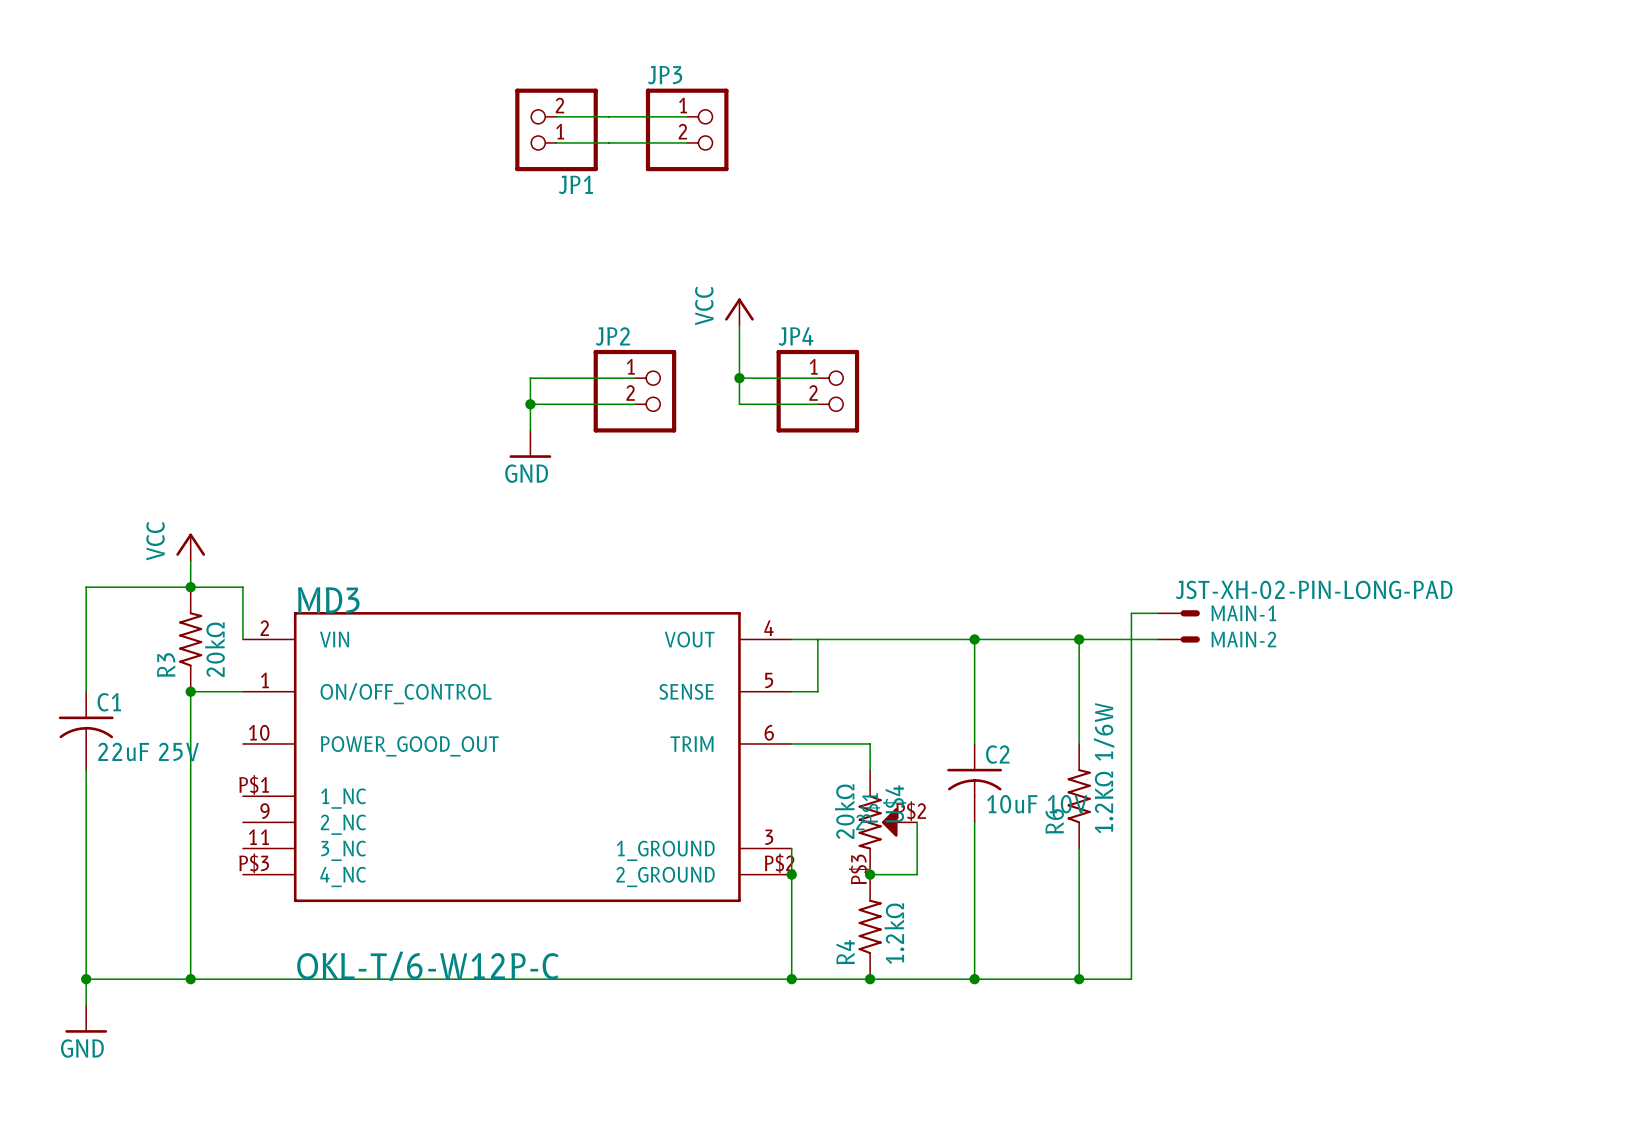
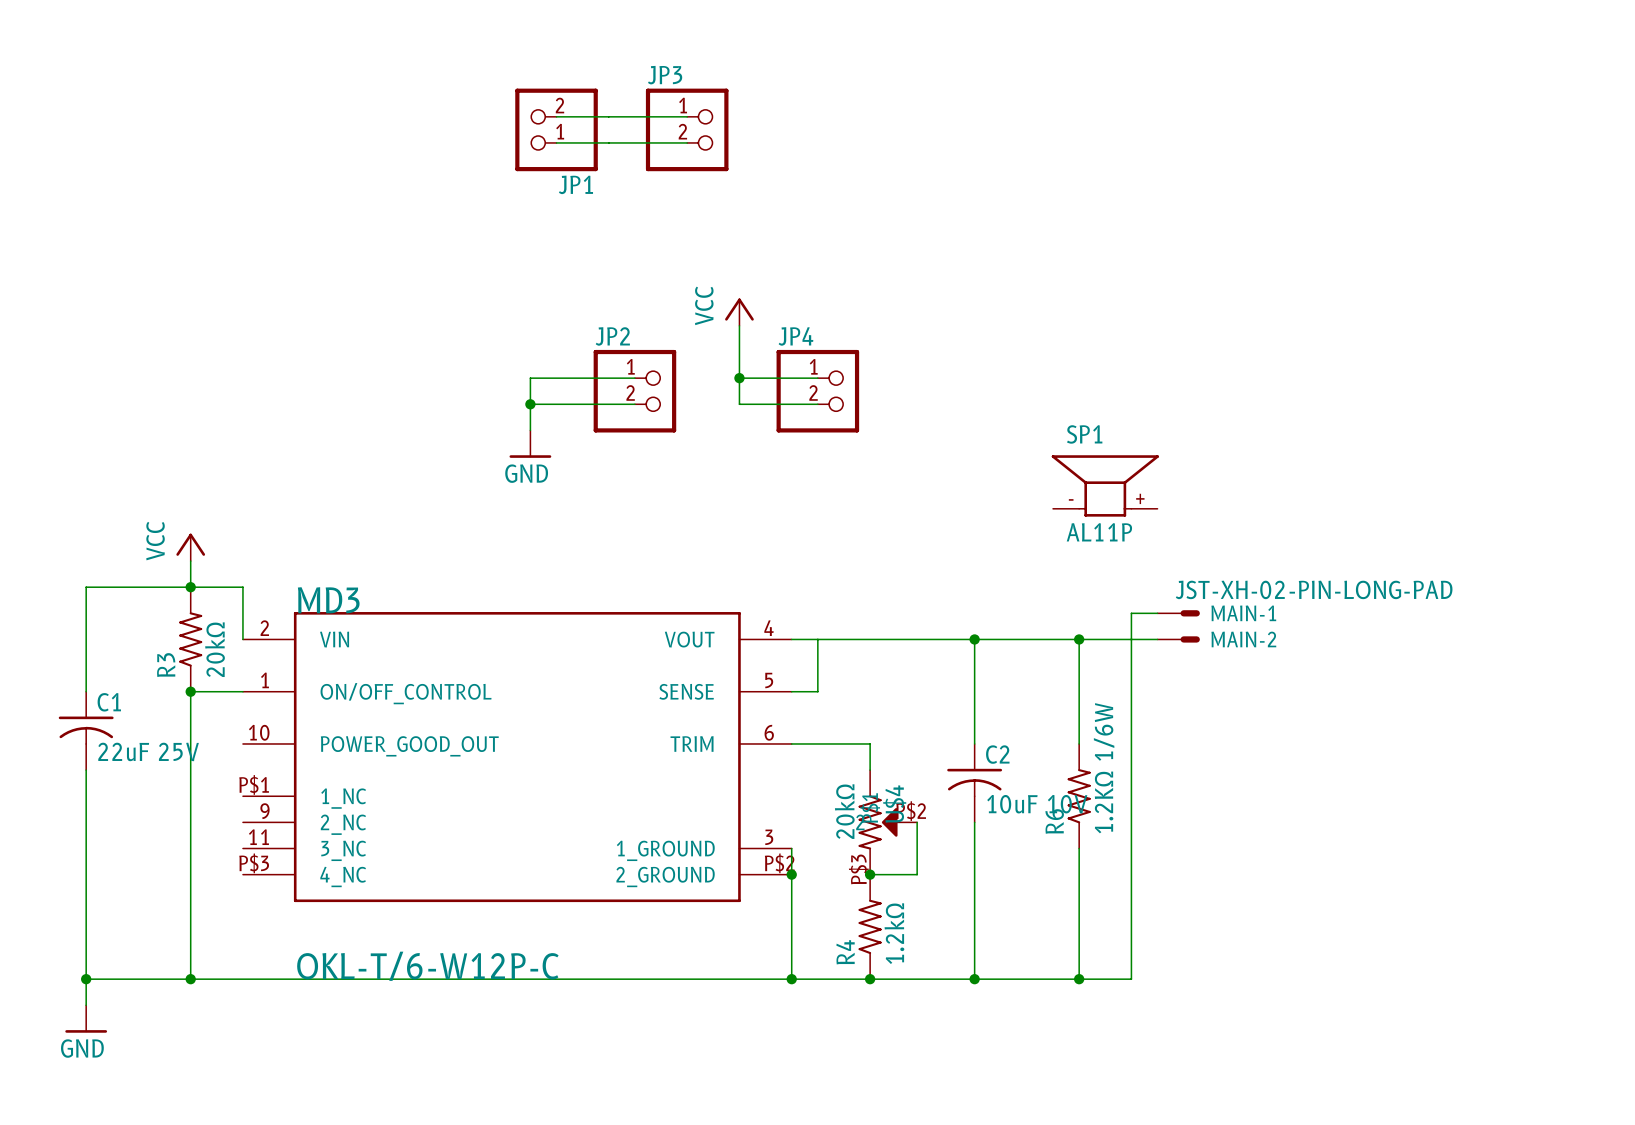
SP1: none -> AL11P (1105, 485)

